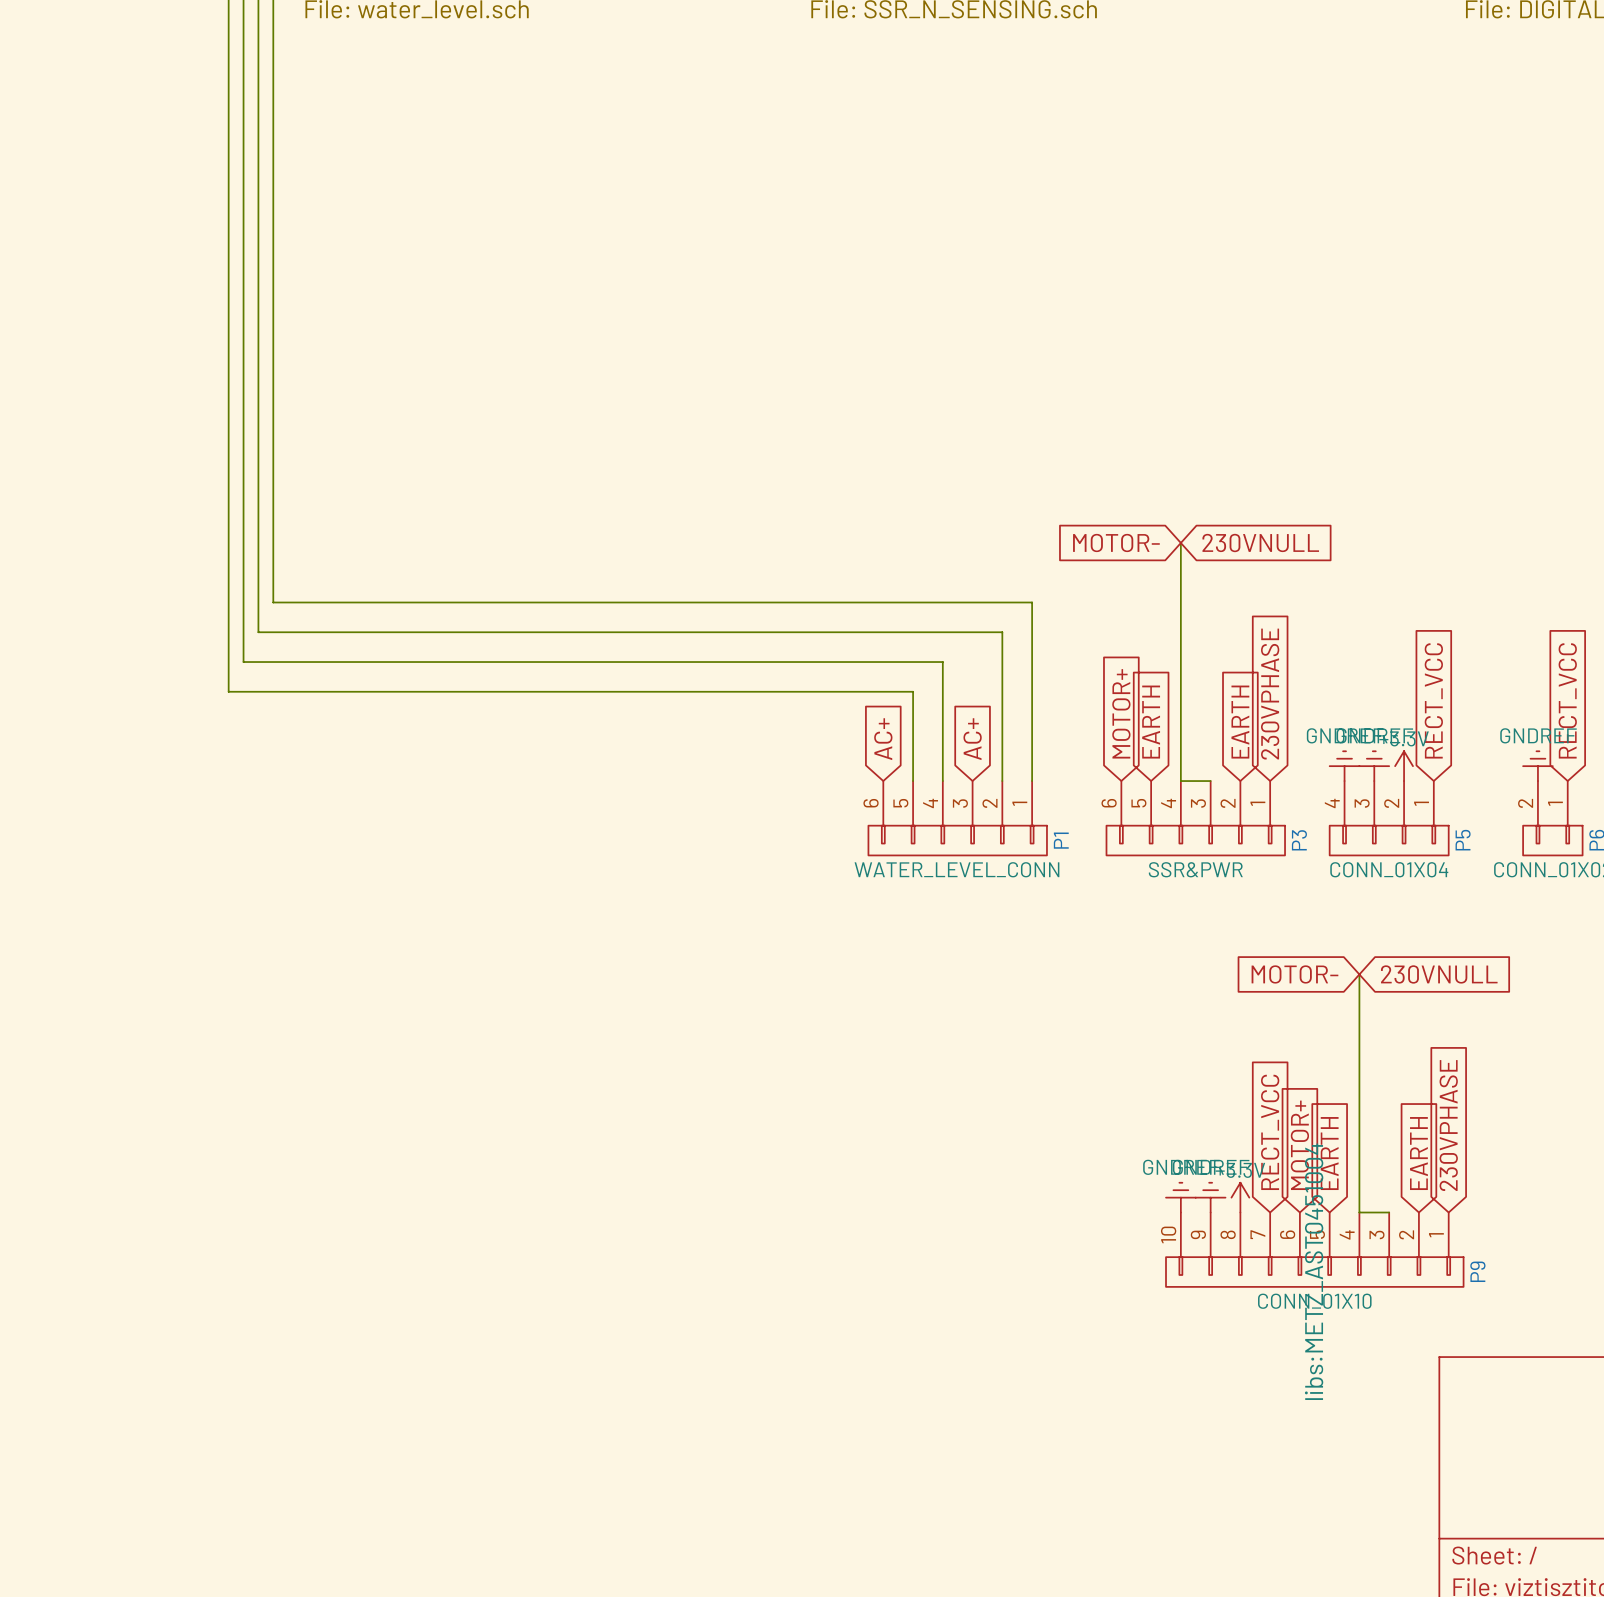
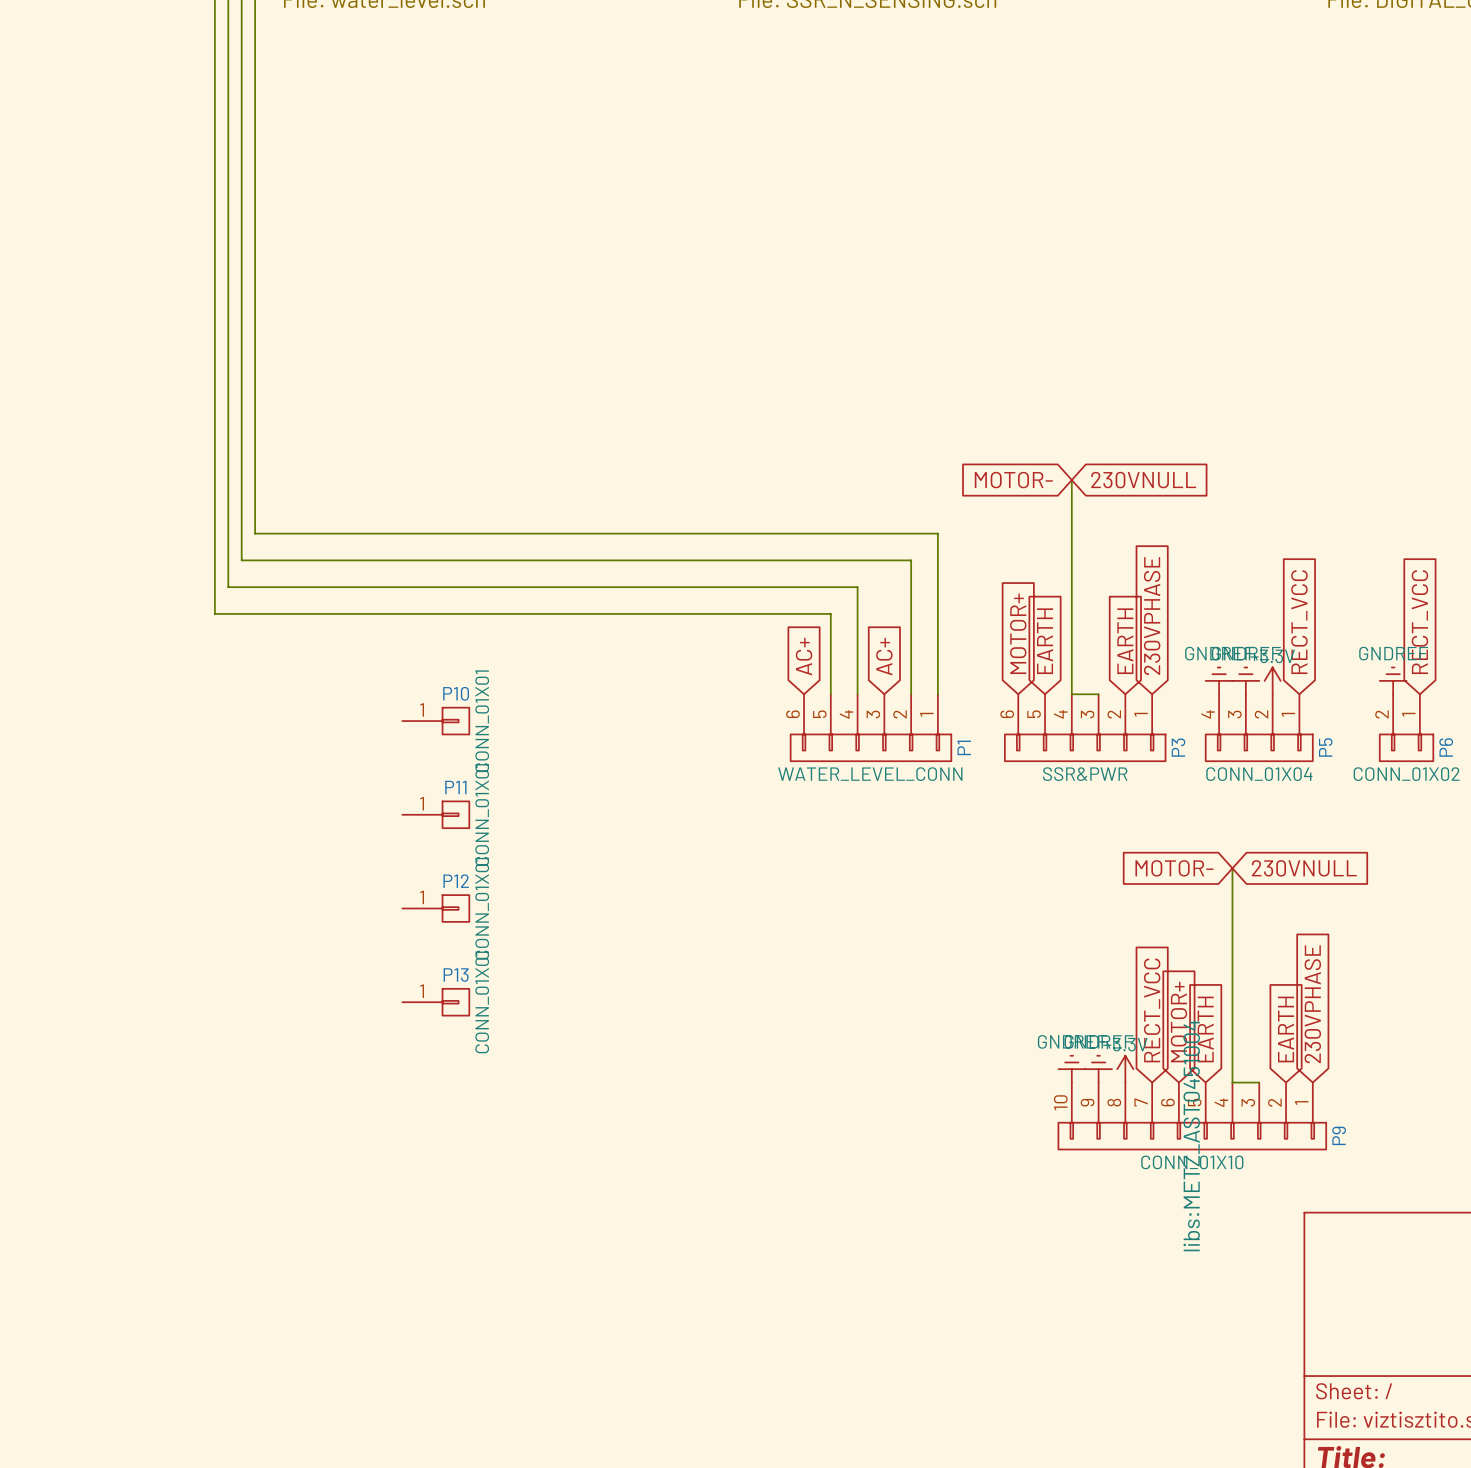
P10: none -> CONN_01X01 (435, 721)
P11: none -> CONN_01X01 (435, 814)
P12: none -> CONN_01X01 (435, 908)
P13: none -> CONN_01X01 (435, 1002)

